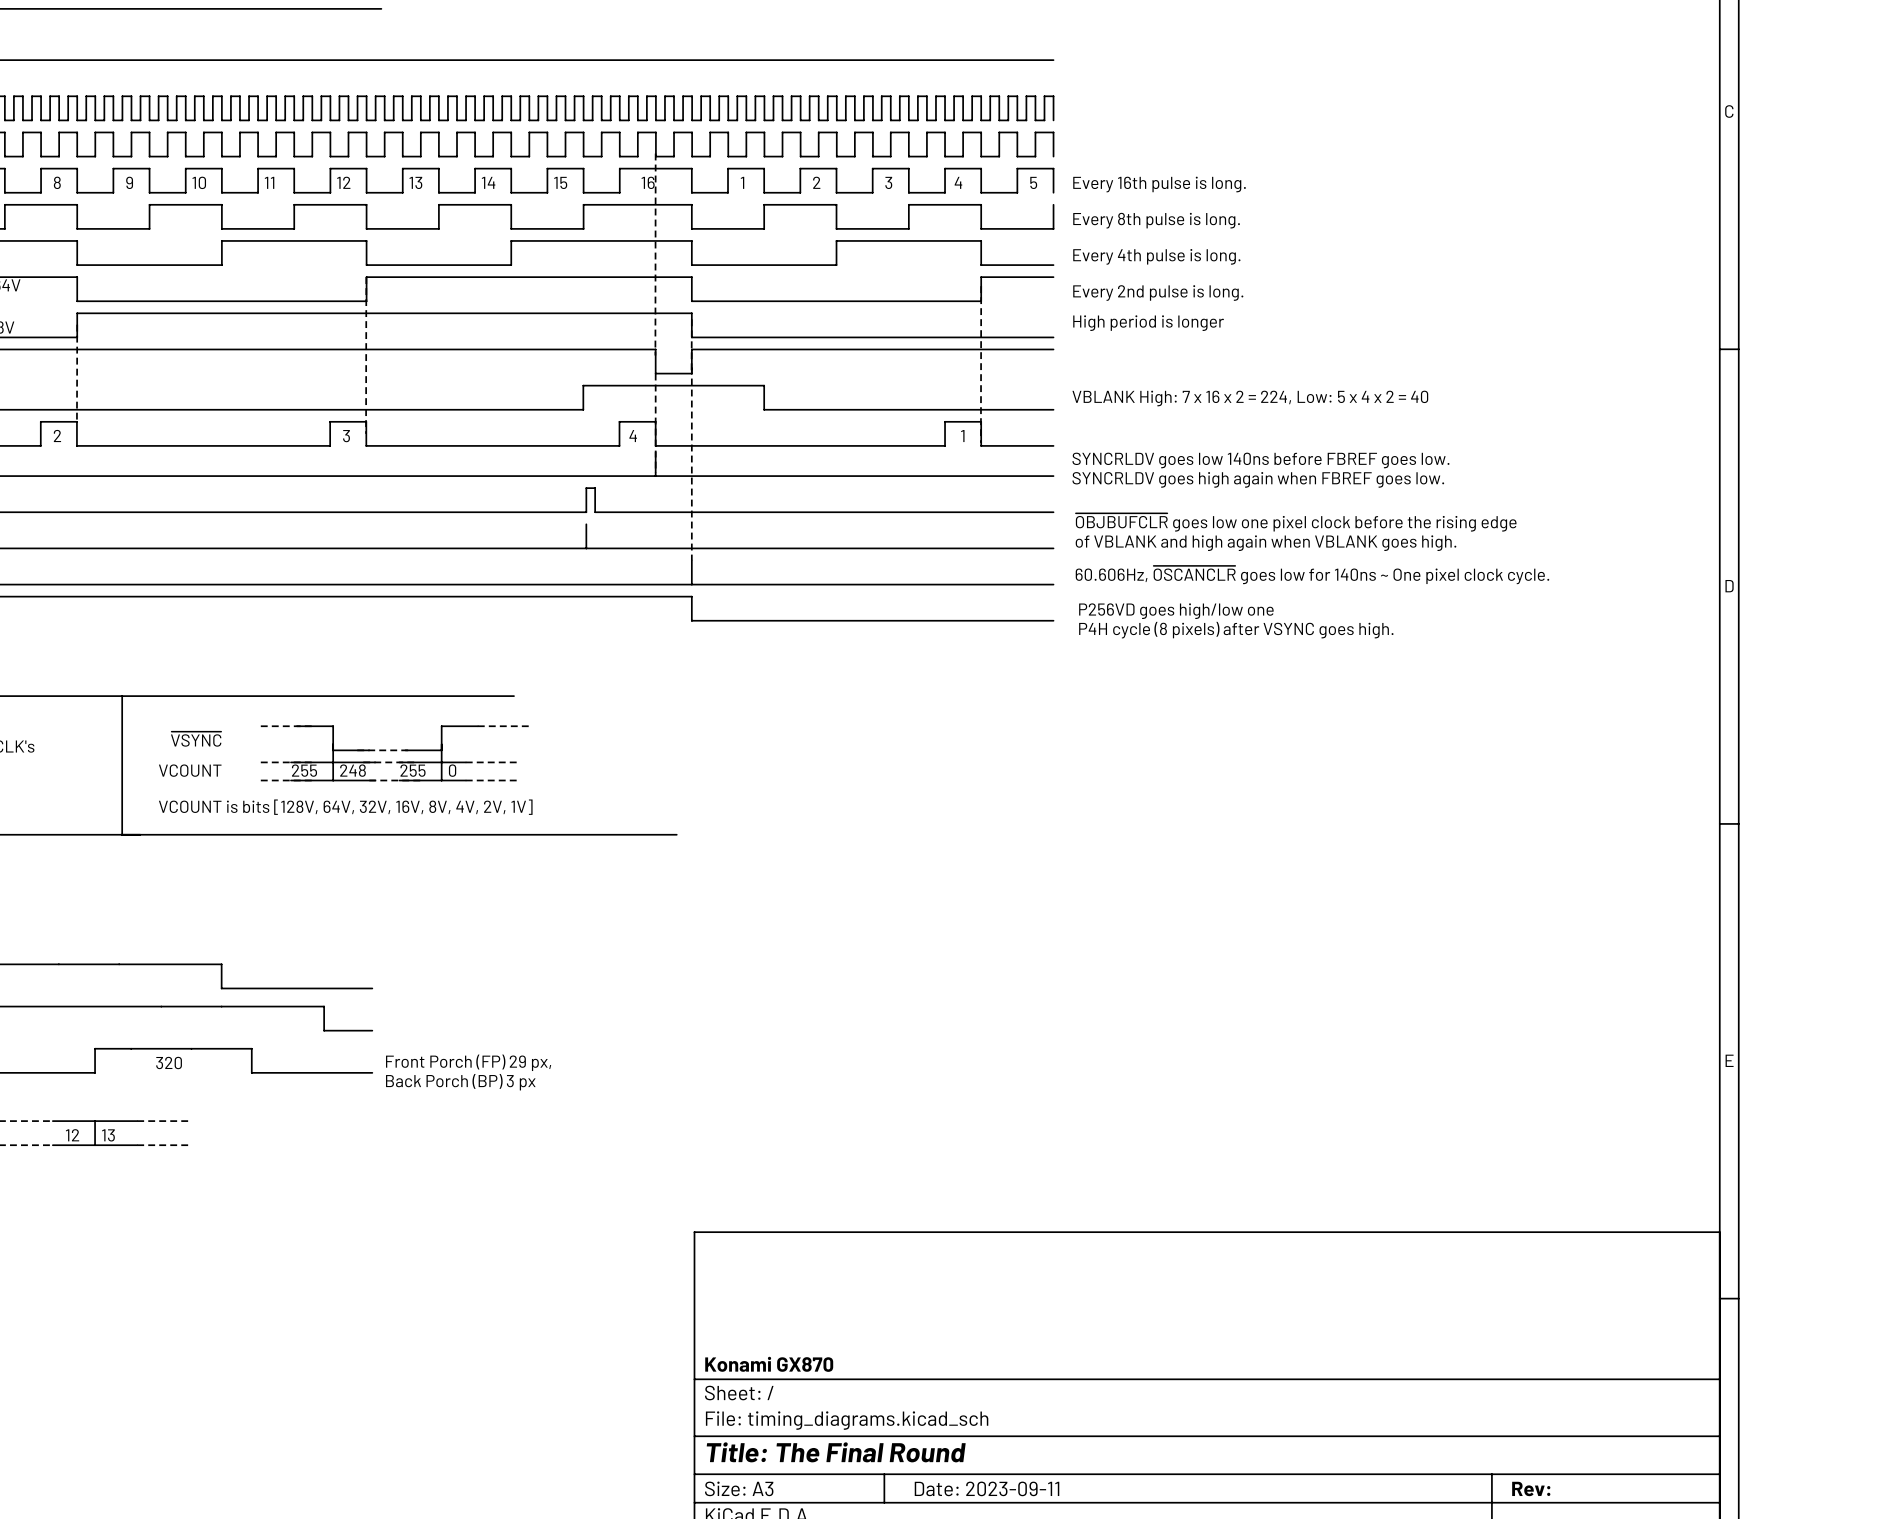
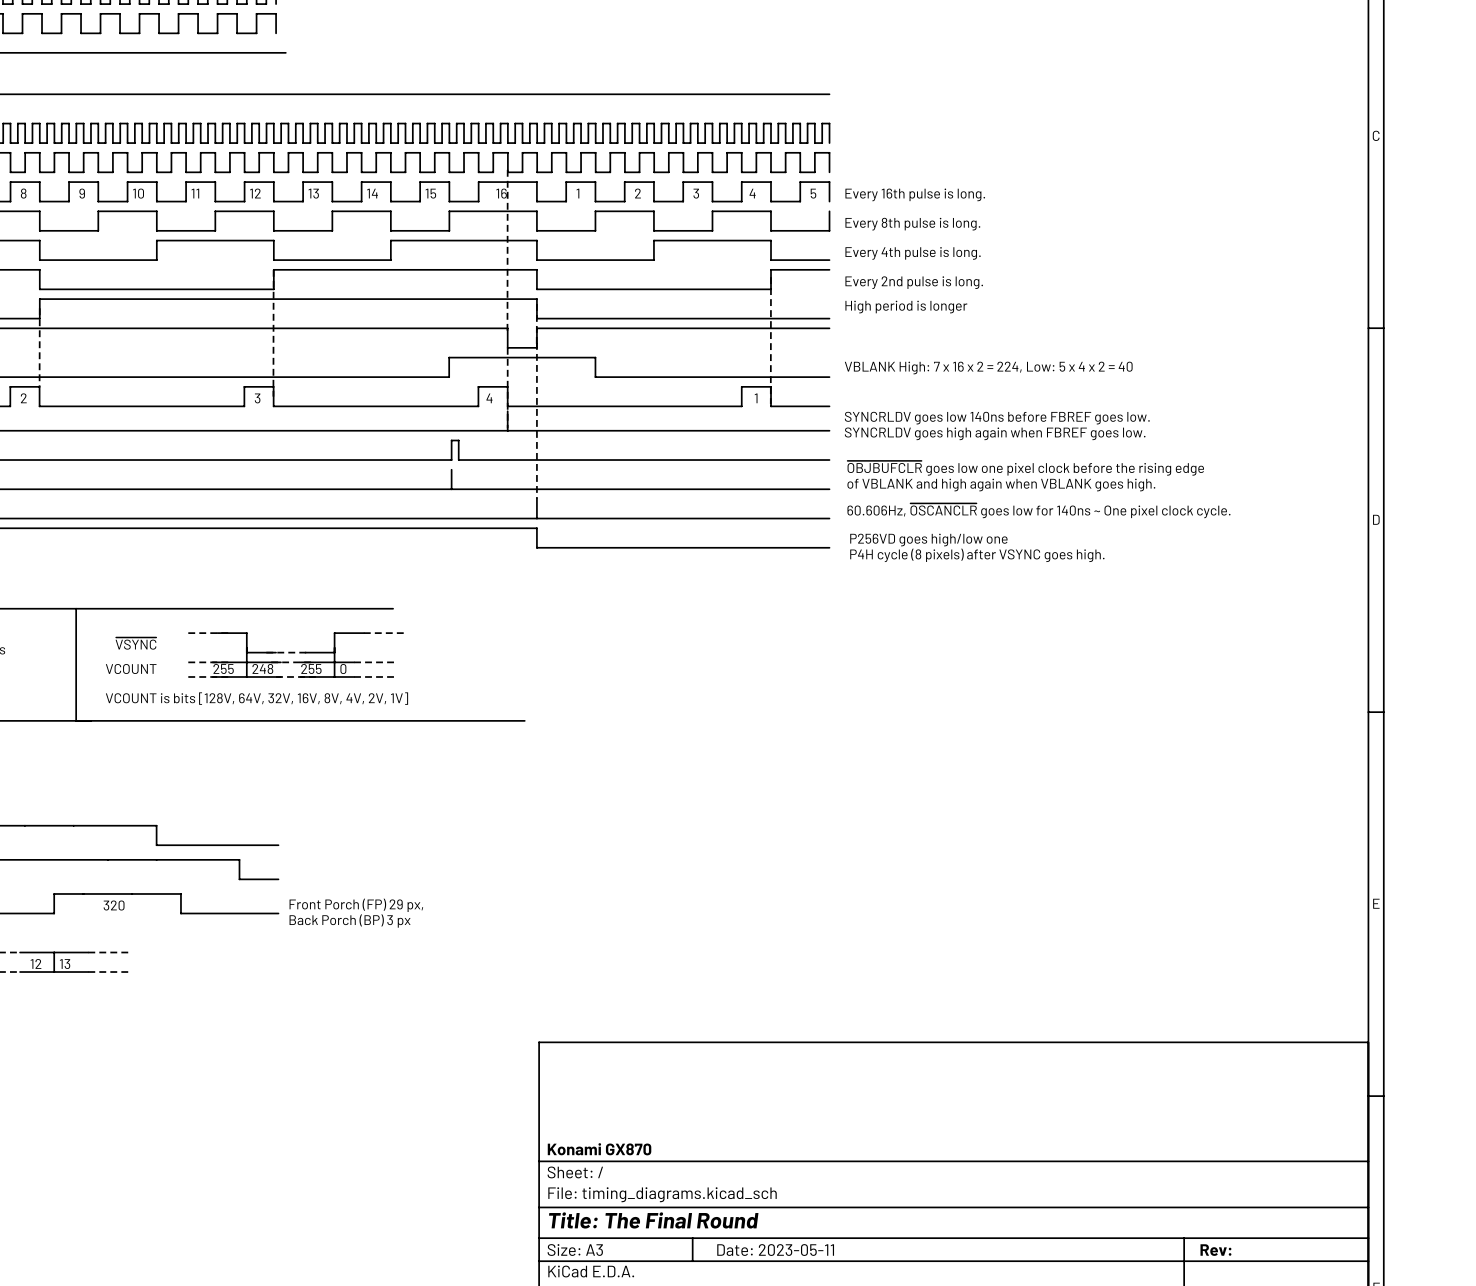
title block: Date: 2023-09-11 (987, 1488) -> Date: 2023-05-11 (775, 1250)

